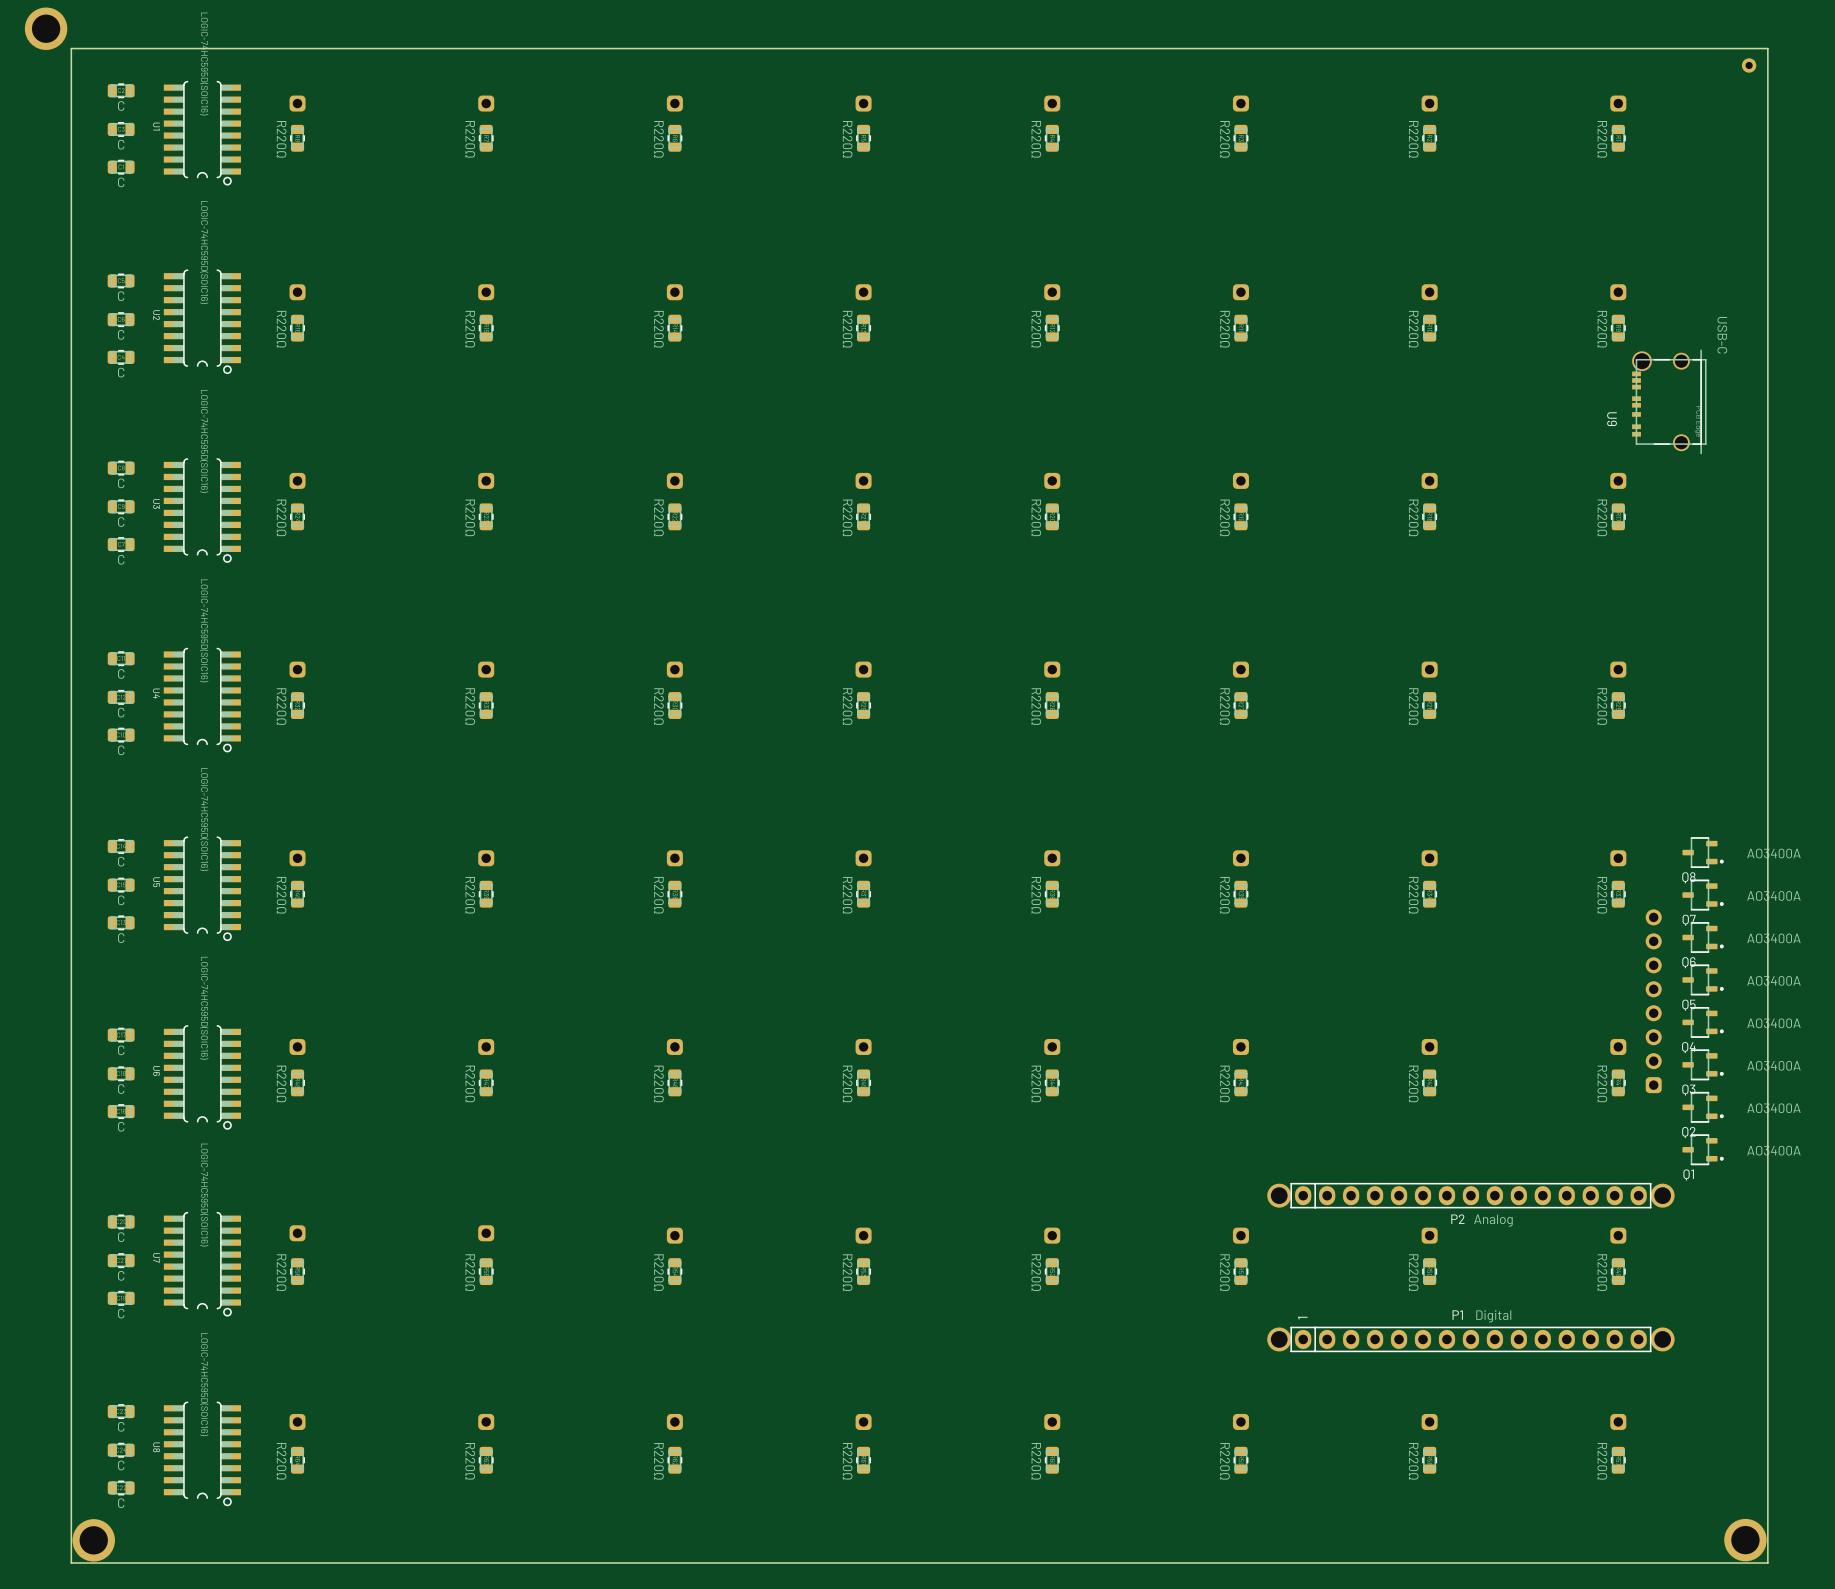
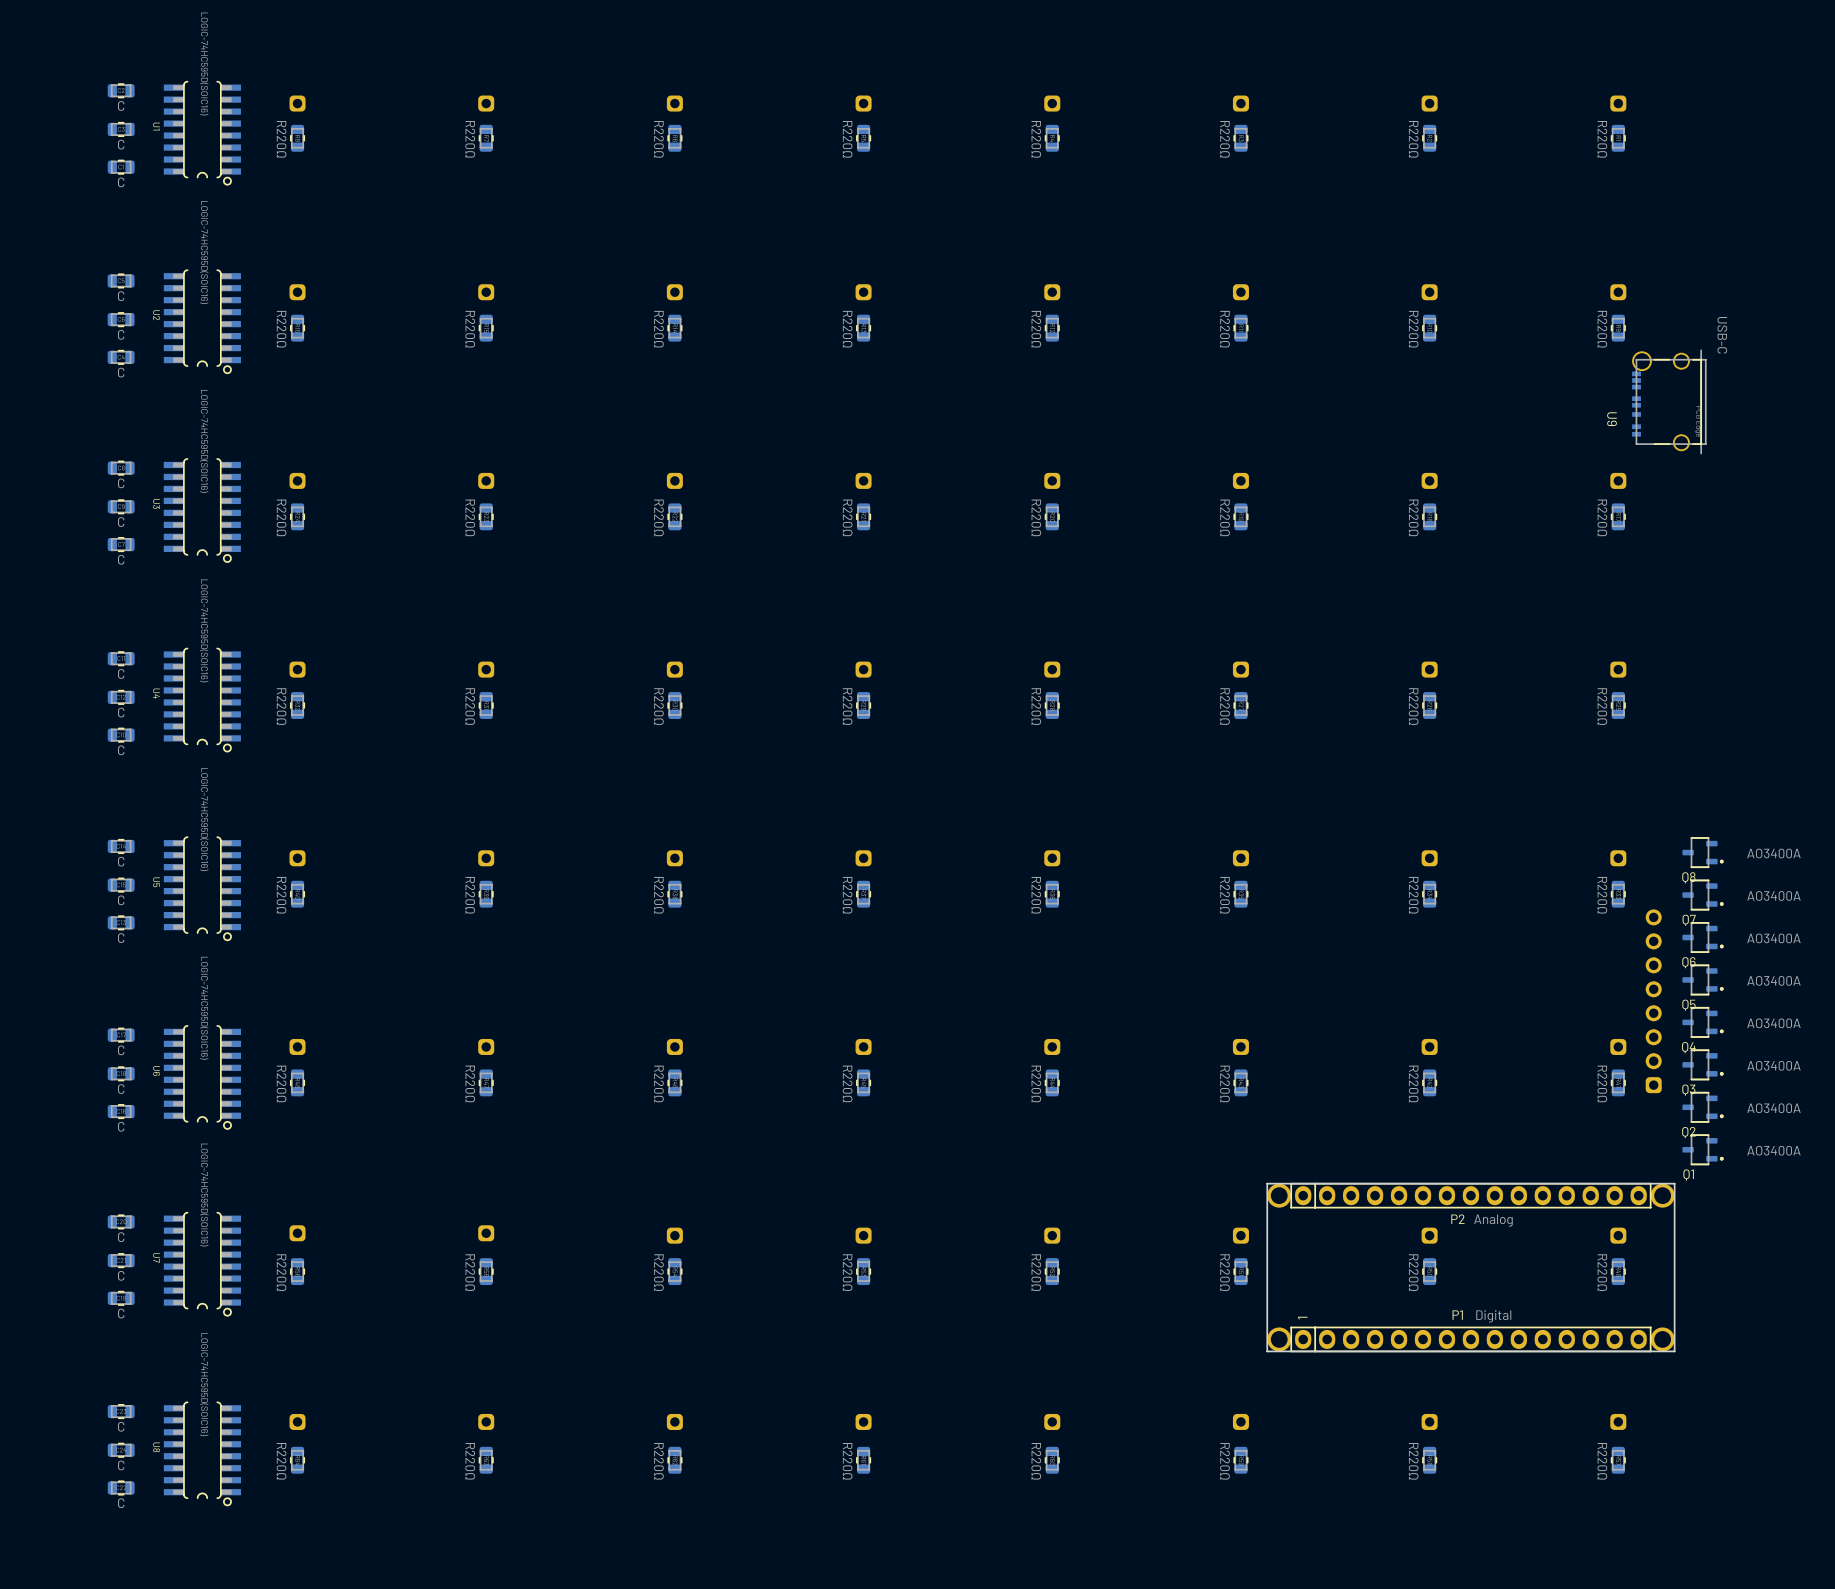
part: (46, 28) -> none
board edge: (1767, 48) (71, 48) (71, 1562) (1767, 1562) (1767, 48) -> none
part: (1749, 65) -> none
board edge: none -> (1674, 1183) (1267, 1183) (1267, 1351) (1674, 1351) (1674, 1183)
part: (93, 1540) -> none
part: (1745, 1540) -> none

